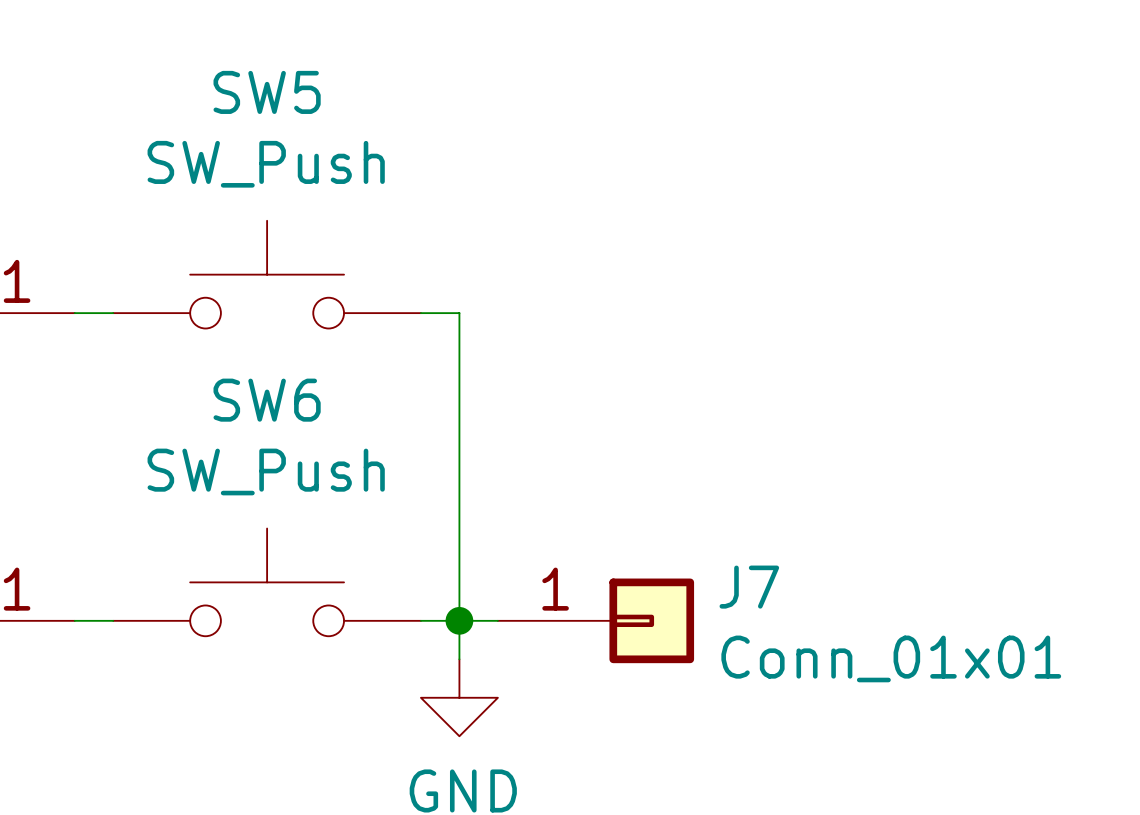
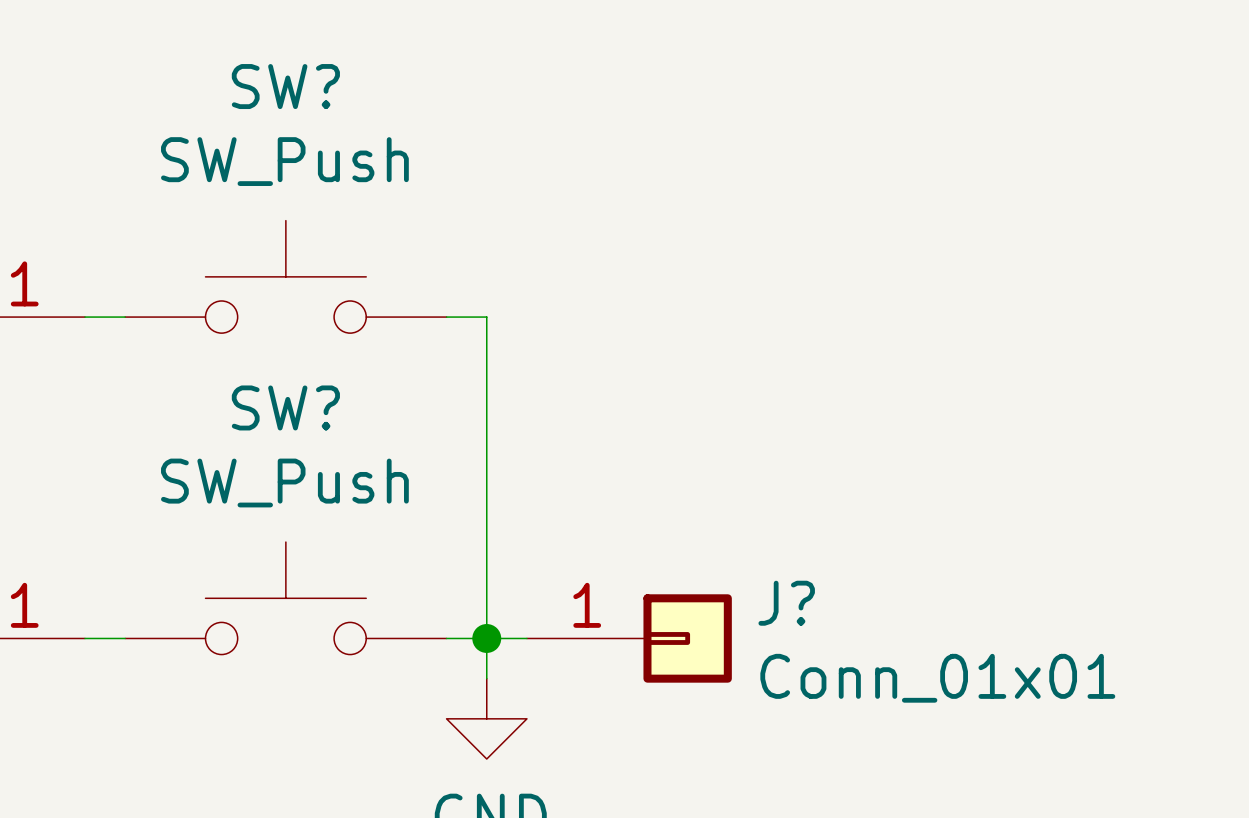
SW5 name: SW5 (267, 92) -> SW? (285, 86)
SW6 name: SW6 (267, 400) -> SW? (285, 407)
J7 name: J7 (749, 587) -> J? (786, 603)

